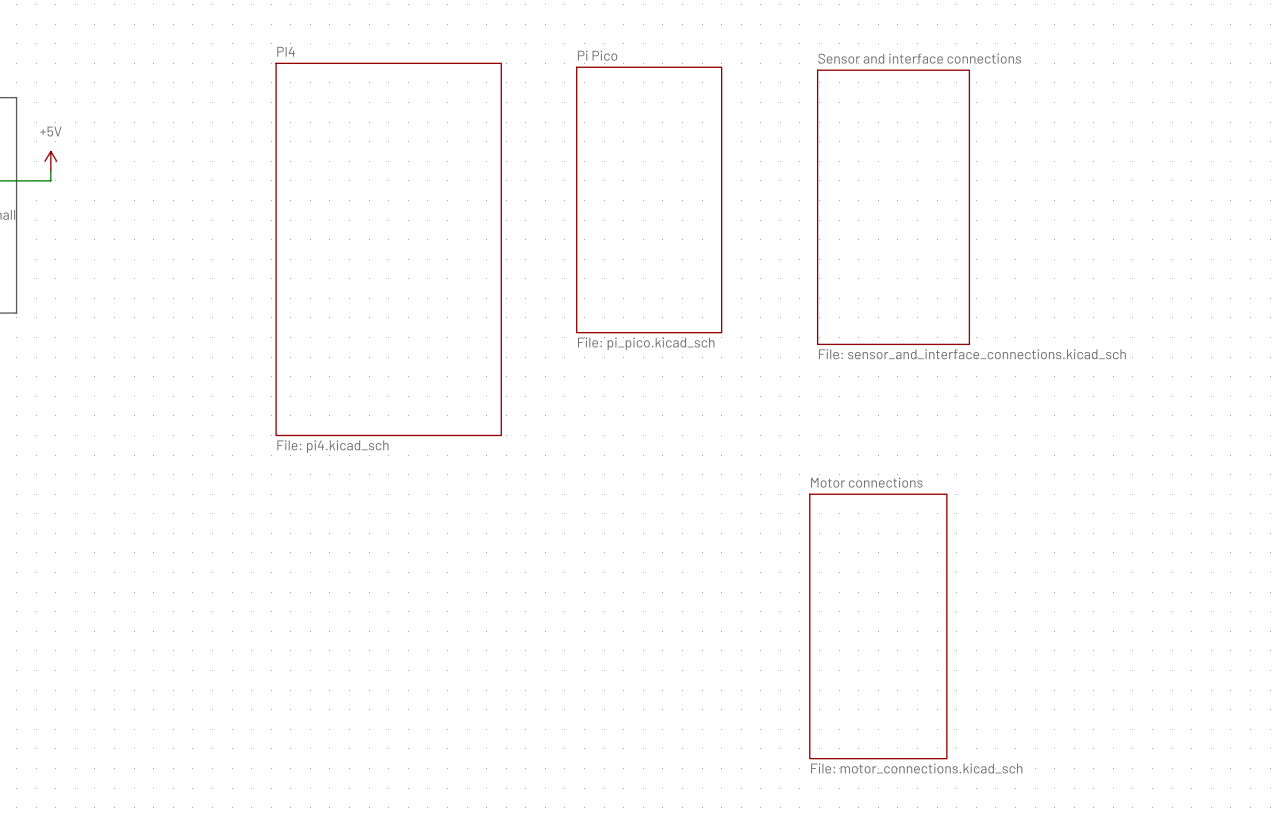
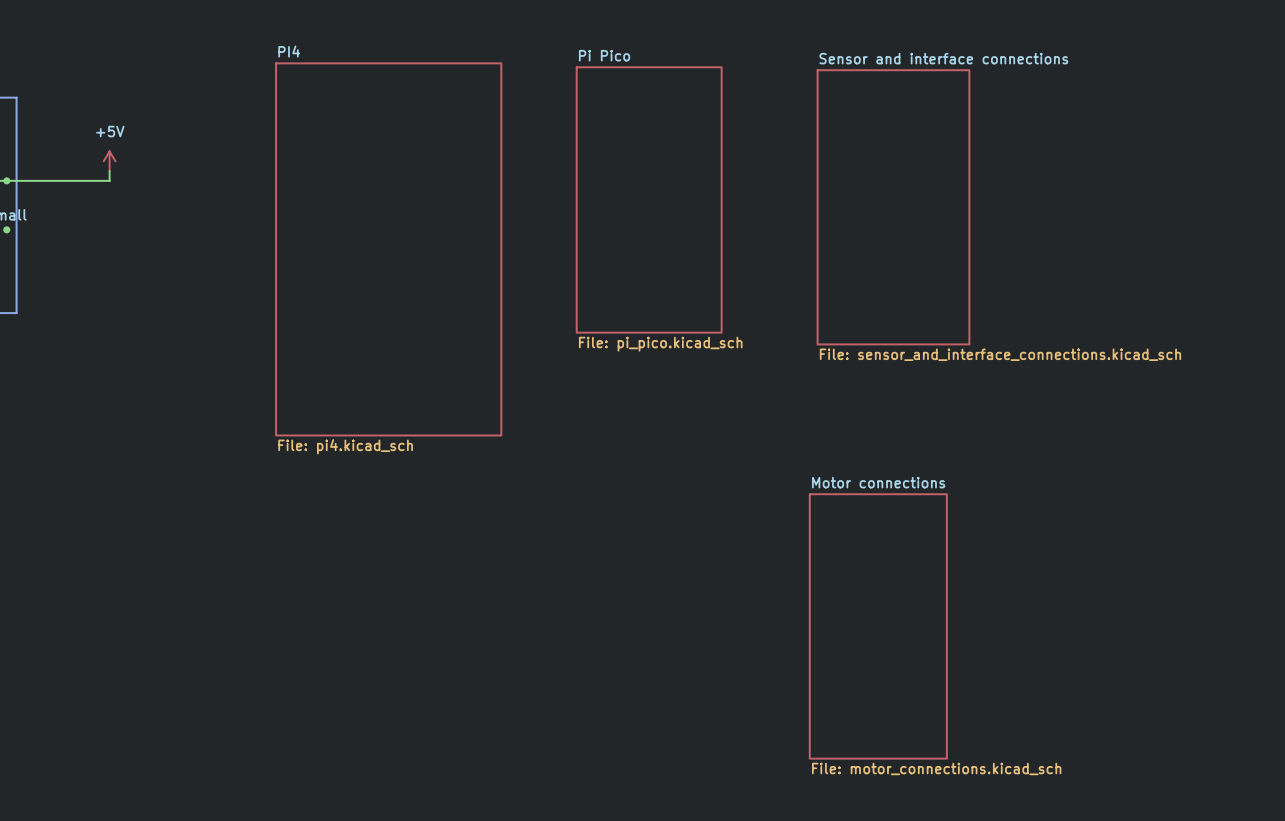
power symbol position: +5V (50, 161) -> +5V (109, 161)
wire: (50, 171) (50, 180) -> (109, 171) (109, 180) (50, 180)
junction: none -> (6, 180)
junction: none -> (6, 229)

